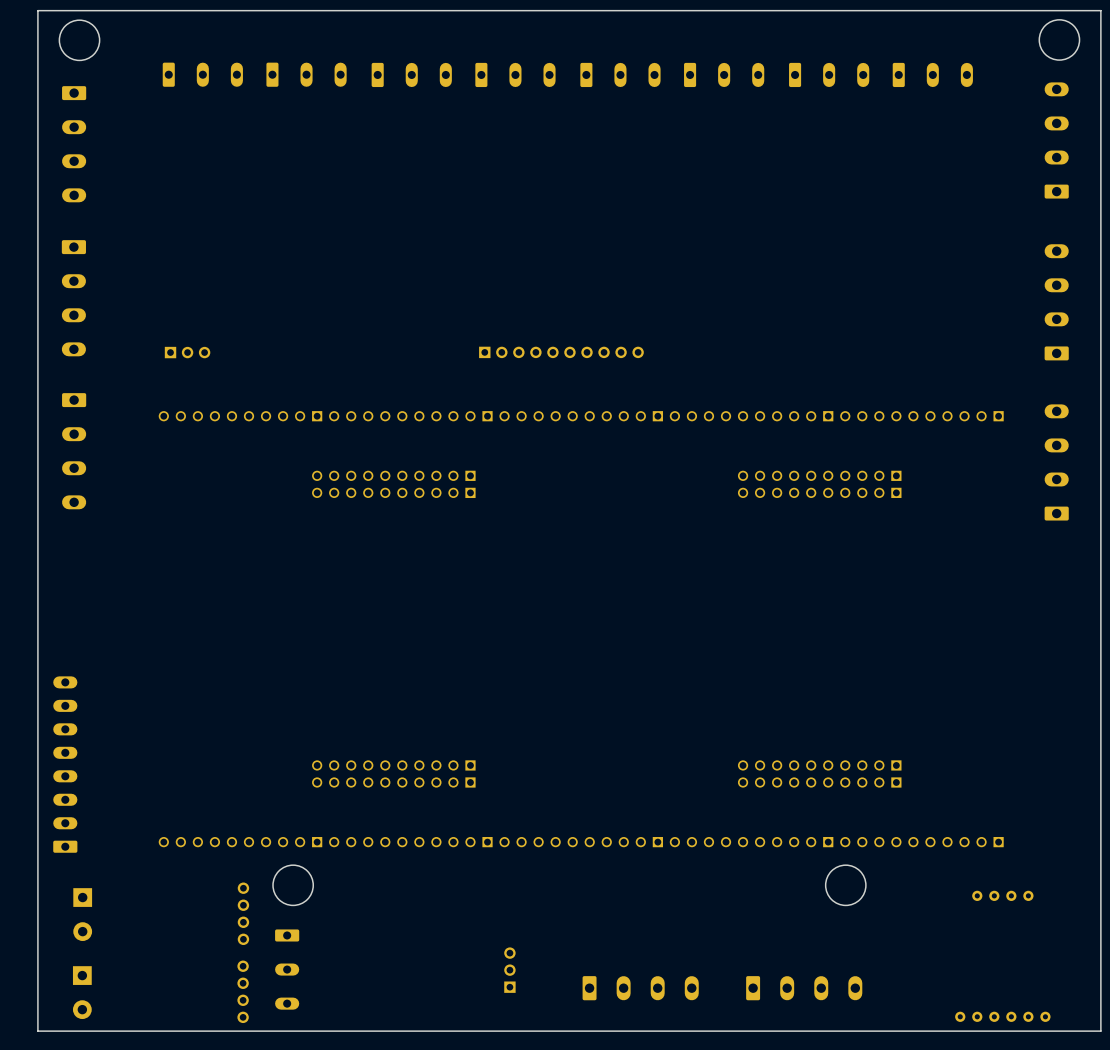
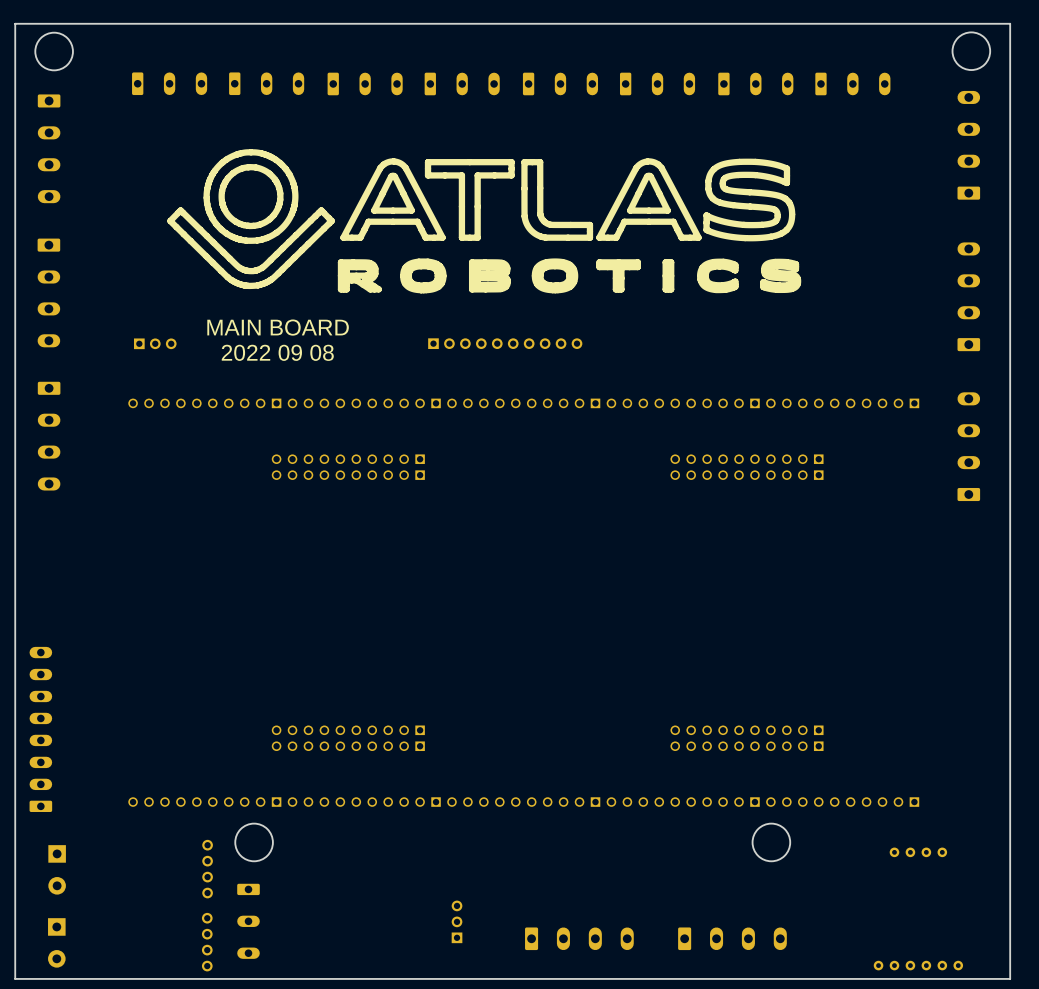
line: none -> (251, 152) (235, 155) (220, 164) (210, 178) (206, 194) (209, 211) (217, 225) (231, 236) (247, 240) (266, 238) (280, 229) (291, 215) (295, 198) (292, 181) (282, 165) (267, 155) (251, 152)
line: none -> (393, 161) (400, 163) (405, 168) (442, 237) (425, 237) (417, 221) (368, 221) (360, 237) (343, 237) (380, 168) (386, 163) (393, 161)
line: none -> (647, 161) (655, 163) (661, 168) (698, 237) (681, 237) (673, 221) (624, 221) (616, 237) (599, 237) (636, 168) (647, 161)
line: none -> (511, 162) (428, 162) (428, 175) (461, 175) (461, 237) (477, 237) (477, 175) (511, 175) (511, 162)
line: none -> (540, 162) (540, 214) (542, 218) (550, 224) (589, 224) (589, 237) (545, 237) (536, 234) (528, 227) (524, 216) (524, 162) (540, 162)
line: none -> (755, 161) (786, 168) (786, 183) (763, 176) (738, 175) (724, 178) (723, 187) (730, 190) (771, 194) (785, 198) (789, 203) (791, 210) (791, 220) (788, 227) (777, 235) (755, 238) (729, 236) (706, 229) (706, 215) (723, 221) (744, 224) (766, 224) (776, 220) (777, 213) (774, 209) (722, 203) (714, 199) (709, 193) (709, 177) (715, 167) (730, 162) (755, 161)
line: none -> (248, 167) (237, 170) (227, 178) (222, 188) (221, 199) (224, 210) (232, 219) (242, 224) (252, 225) (264, 222) (273, 215) (278, 205) (280, 193) (277, 183) (269, 173) (259, 168) (248, 167)
line: none -> (394, 176) (391, 176) (374, 210) (411, 210) (394, 176)
line: none -> (647, 176) (630, 210) (667, 210) (650, 176) (647, 176)
line: none -> (321, 210) (264, 266) (252, 271) (243, 269) (238, 266) (180, 210) (170, 220) (229, 278) (242, 284) (254, 285) (263, 283) (273, 278) (331, 220) (321, 210)
line: none -> (427, 261) (414, 262) (405, 267) (403, 277) (407, 286) (415, 289) (427, 290) (435, 288) (440, 284) (443, 277) (441, 268) (436, 263) (427, 261)
line: none -> (723, 261) (735, 265) (735, 270) (723, 266) (711, 267) (706, 271) (706, 280) (709, 283) (717, 285) (735, 281) (735, 286) (717, 290) (704, 286) (700, 277) (702, 267) (709, 262) (723, 261)
line: none -> (353, 262) (340, 262) (340, 289) (346, 289) (346, 280) (356, 280) (370, 289) (378, 289) (365, 280) (374, 275) (373, 265) (368, 262) (353, 262)
line: none -> (485, 262) (472, 262) (472, 289) (499, 289) (505, 287) (507, 279) (501, 275) (506, 271) (506, 265) (500, 262) (485, 262)
line: none -> (562, 262) (547, 262) (538, 266) (534, 275) (538, 285) (544, 288) (554, 290) (564, 289) (571, 285) (574, 278) (574, 270) (569, 264) (562, 262)
line: none -> (637, 262) (599, 262) (599, 267) (615, 267) (615, 289) (621, 289) (621, 267) (637, 267) (637, 262)
line: none -> (671, 262) (665, 262) (665, 289) (671, 289) (671, 262)
line: none -> (775, 261) (796, 264) (795, 269) (778, 266) (771, 267) (769, 269) (772, 272) (795, 275) (798, 280) (795, 286) (779, 289) (763, 286) (763, 282) (779, 285) (792, 283) (790, 279) (765, 274) (765, 265) (775, 261)
line: none -> (421, 266) (430, 266) (435, 269) (437, 277) (435, 282) (422, 285) (410, 281) (408, 276) (410, 270) (421, 266)
line: none -> (554, 266) (563, 267) (568, 270) (569, 278) (566, 283) (551, 285) (541, 281) (540, 275) (542, 269) (554, 266)
line: none -> (346, 267) (346, 275) (366, 275) (369, 272) (367, 267) (346, 267)
line: none -> (477, 266) (477, 273) (498, 273) (501, 270) (498, 267) (477, 266)
line: none -> (477, 277) (477, 284) (499, 284) (501, 282) (498, 278) (477, 277)
text: none -> MAIN BOARD (278, 327)
text: none -> 2022 09 08 (277, 352)

